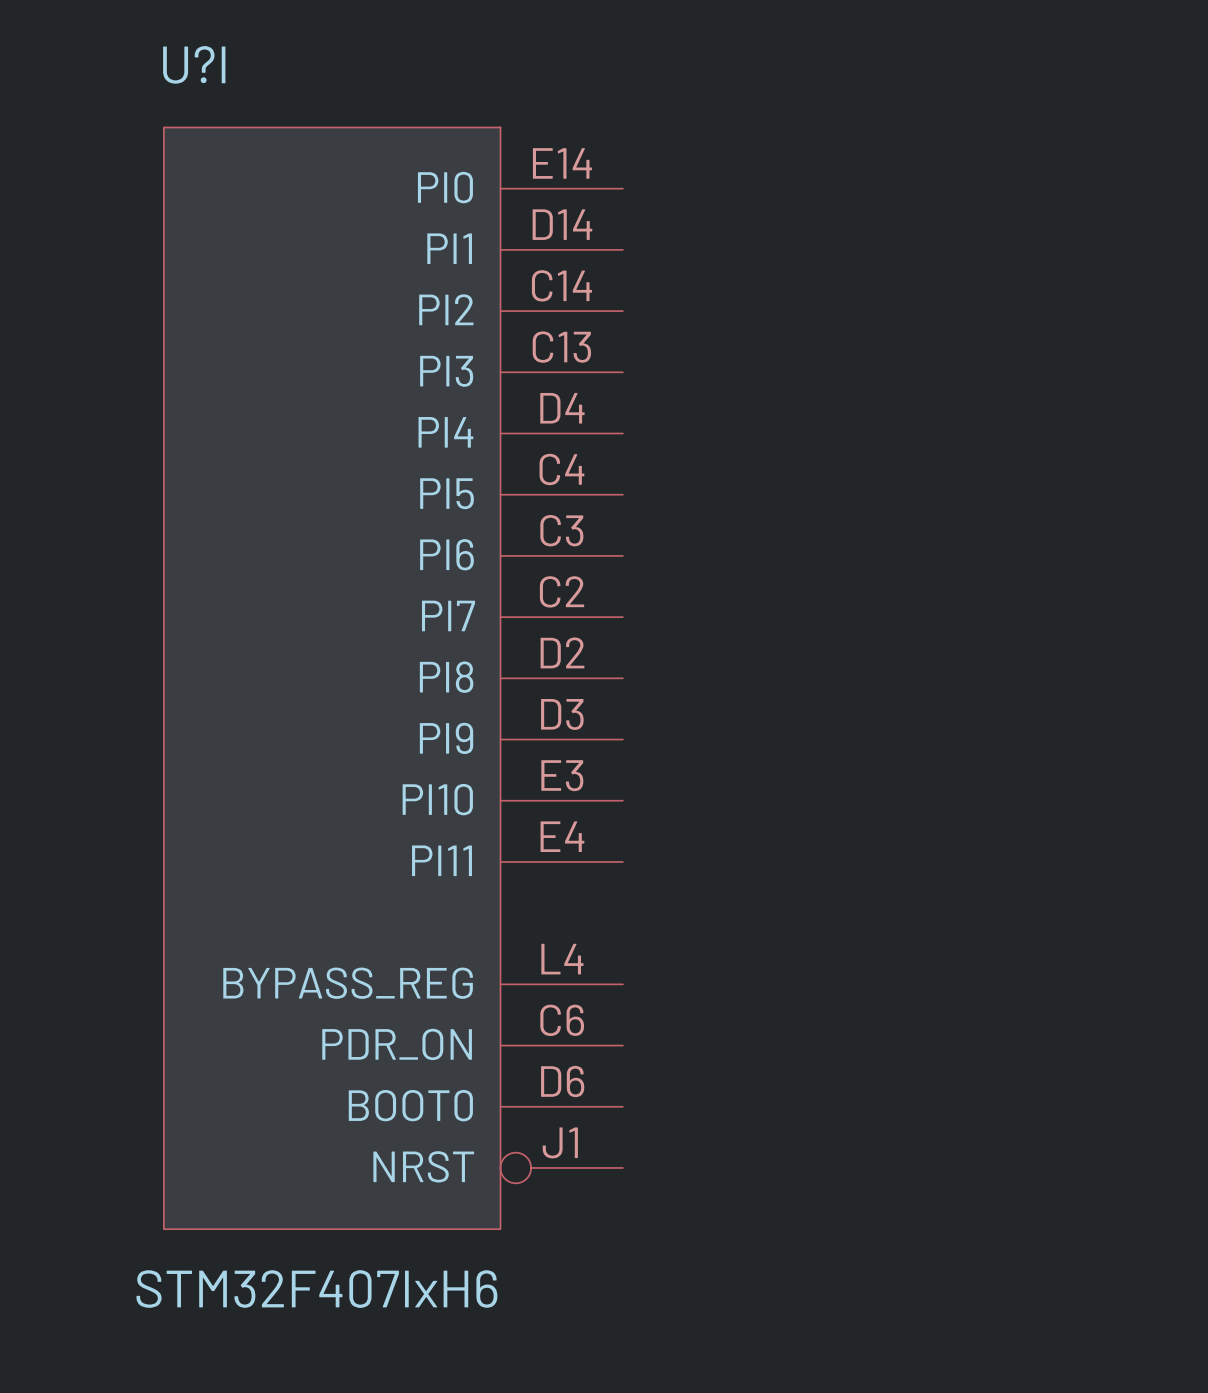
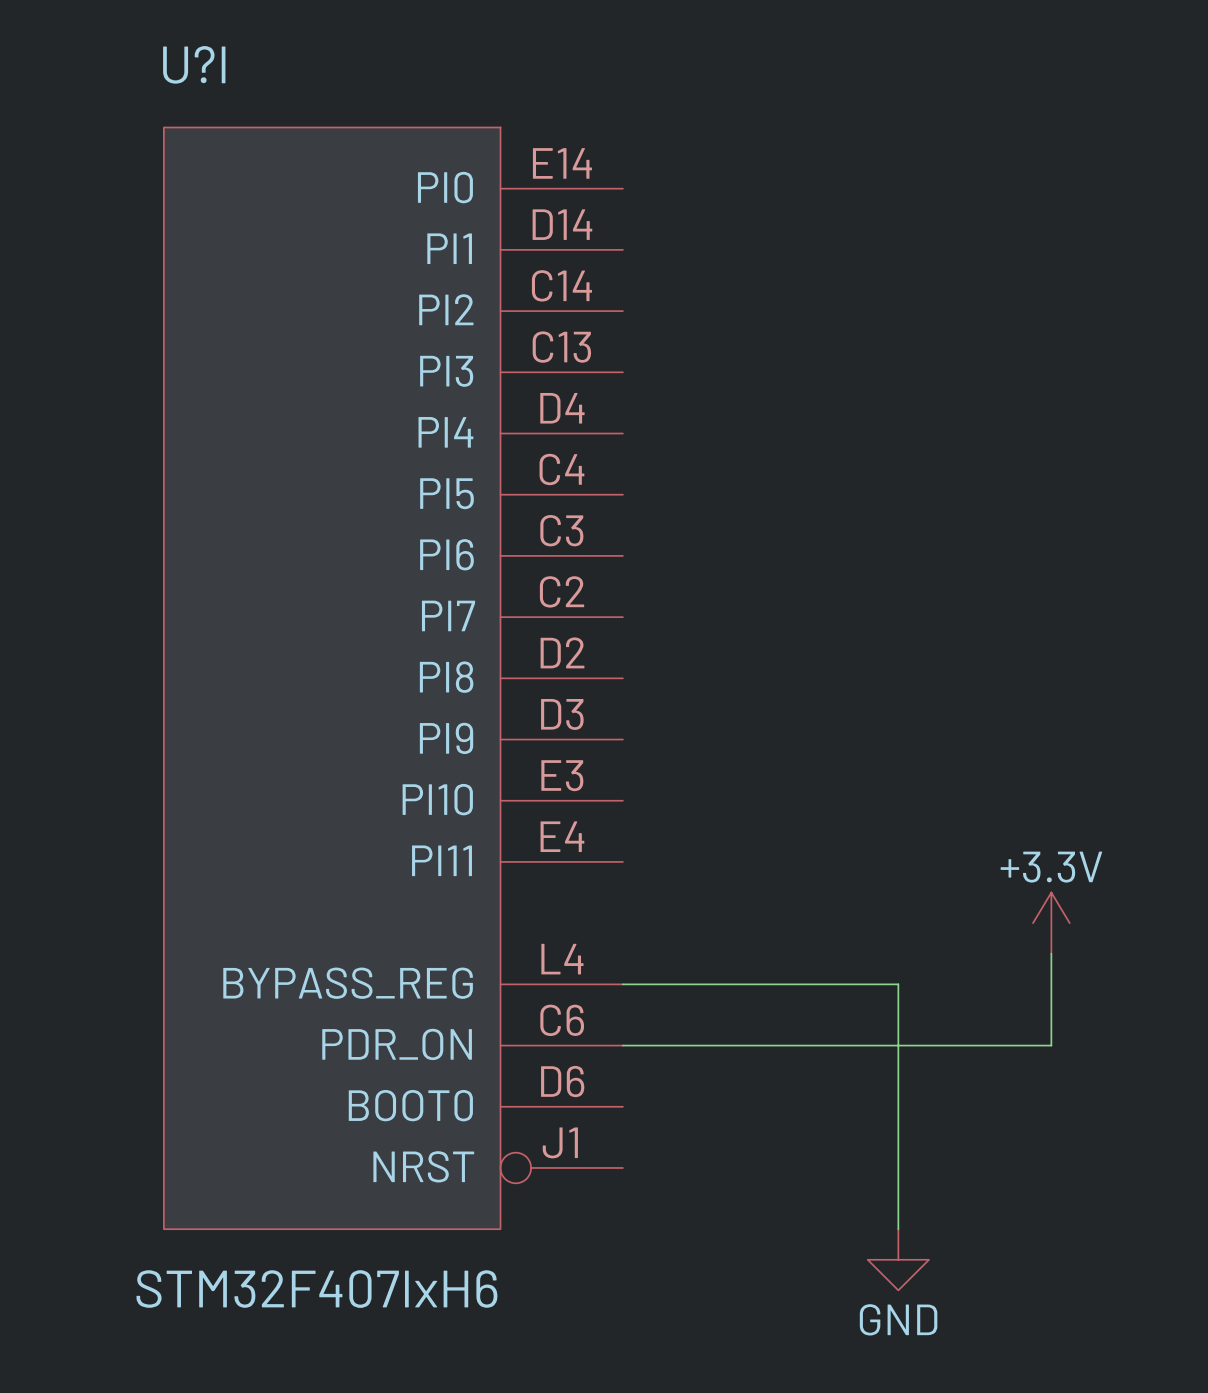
power symbol: none -> +3.3V (1051, 923)
wire: none -> (1051, 953) (1051, 1045) (622, 1045)
wire: none -> (622, 984) (898, 984) (898, 1229)
power symbol: none -> GND (898, 1259)

